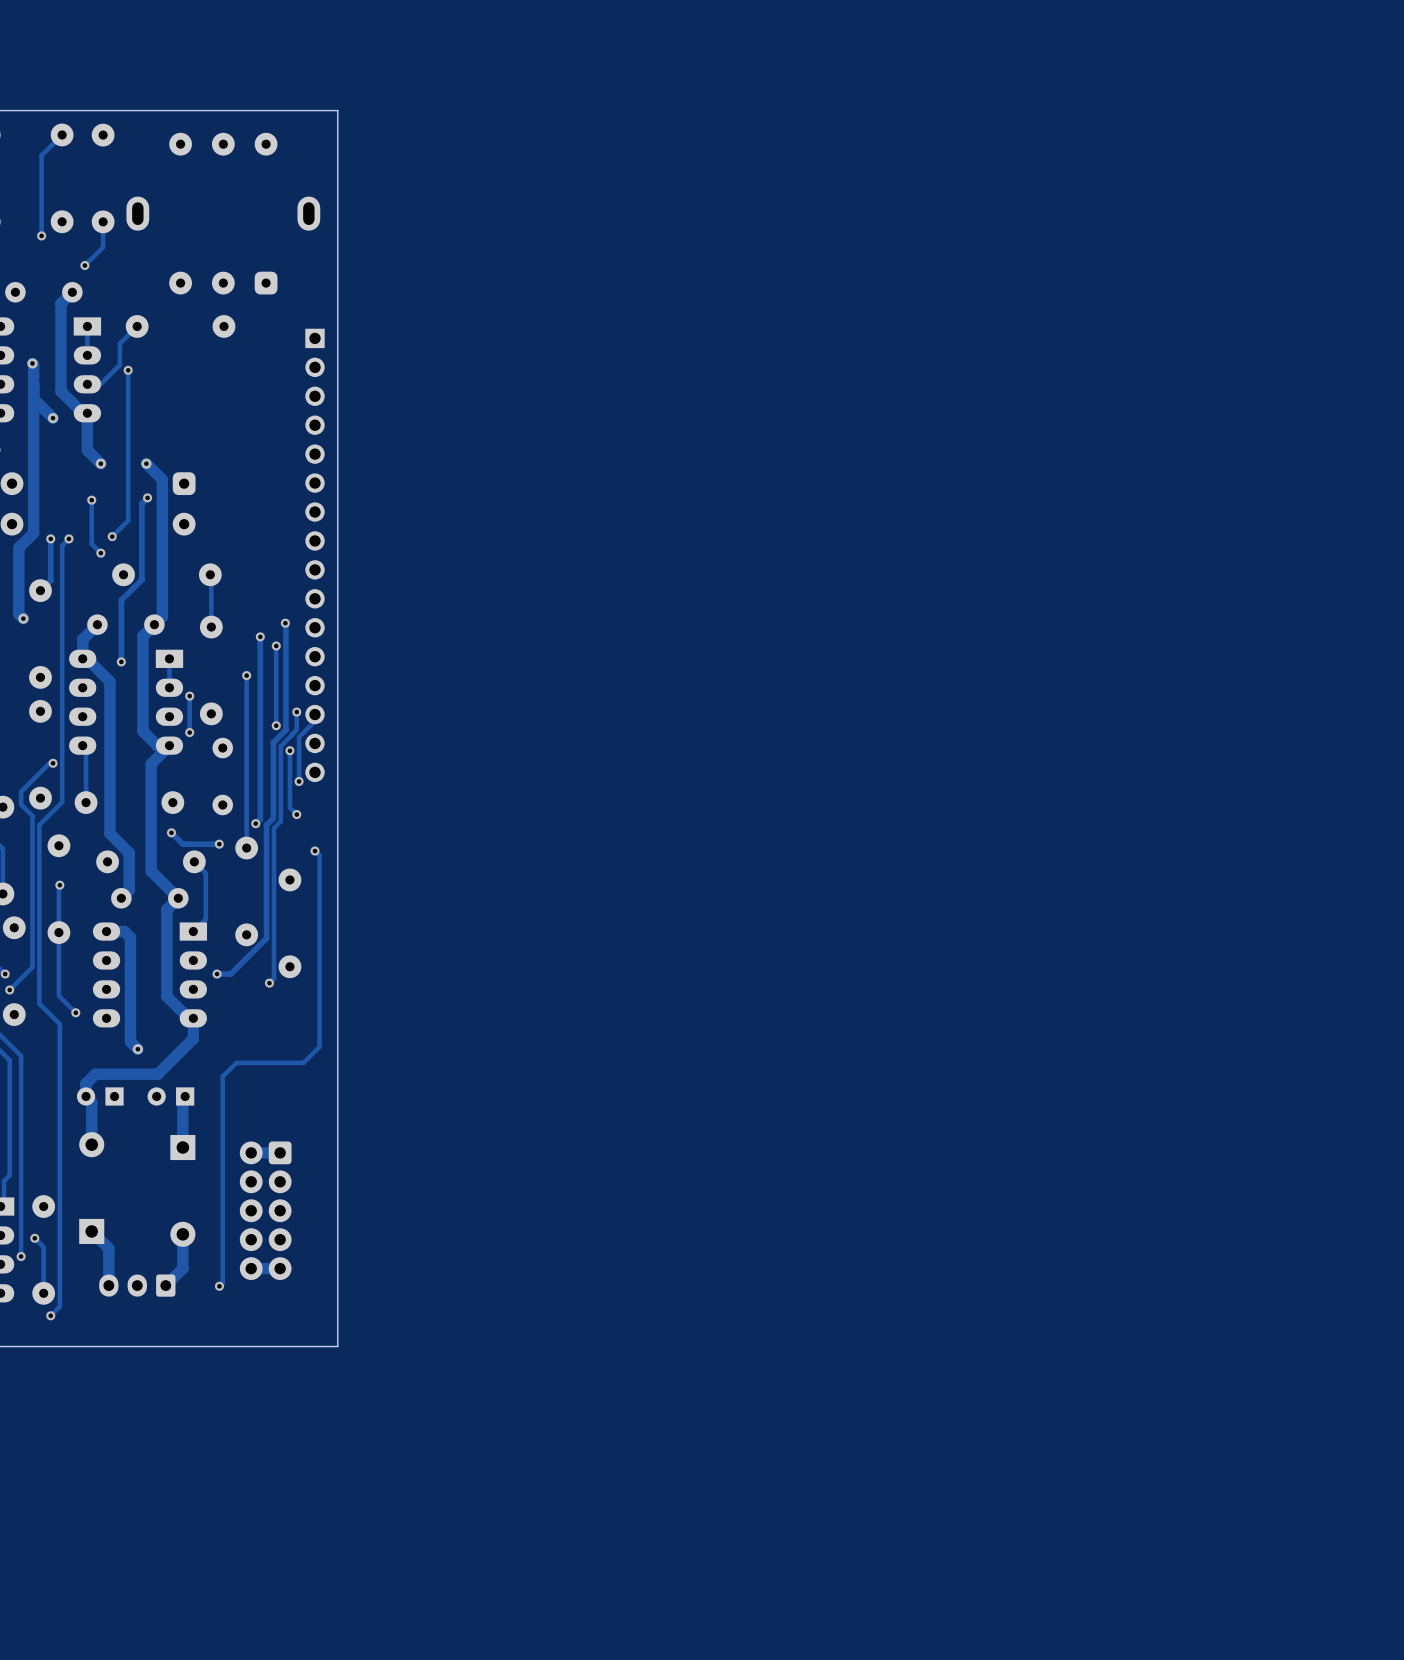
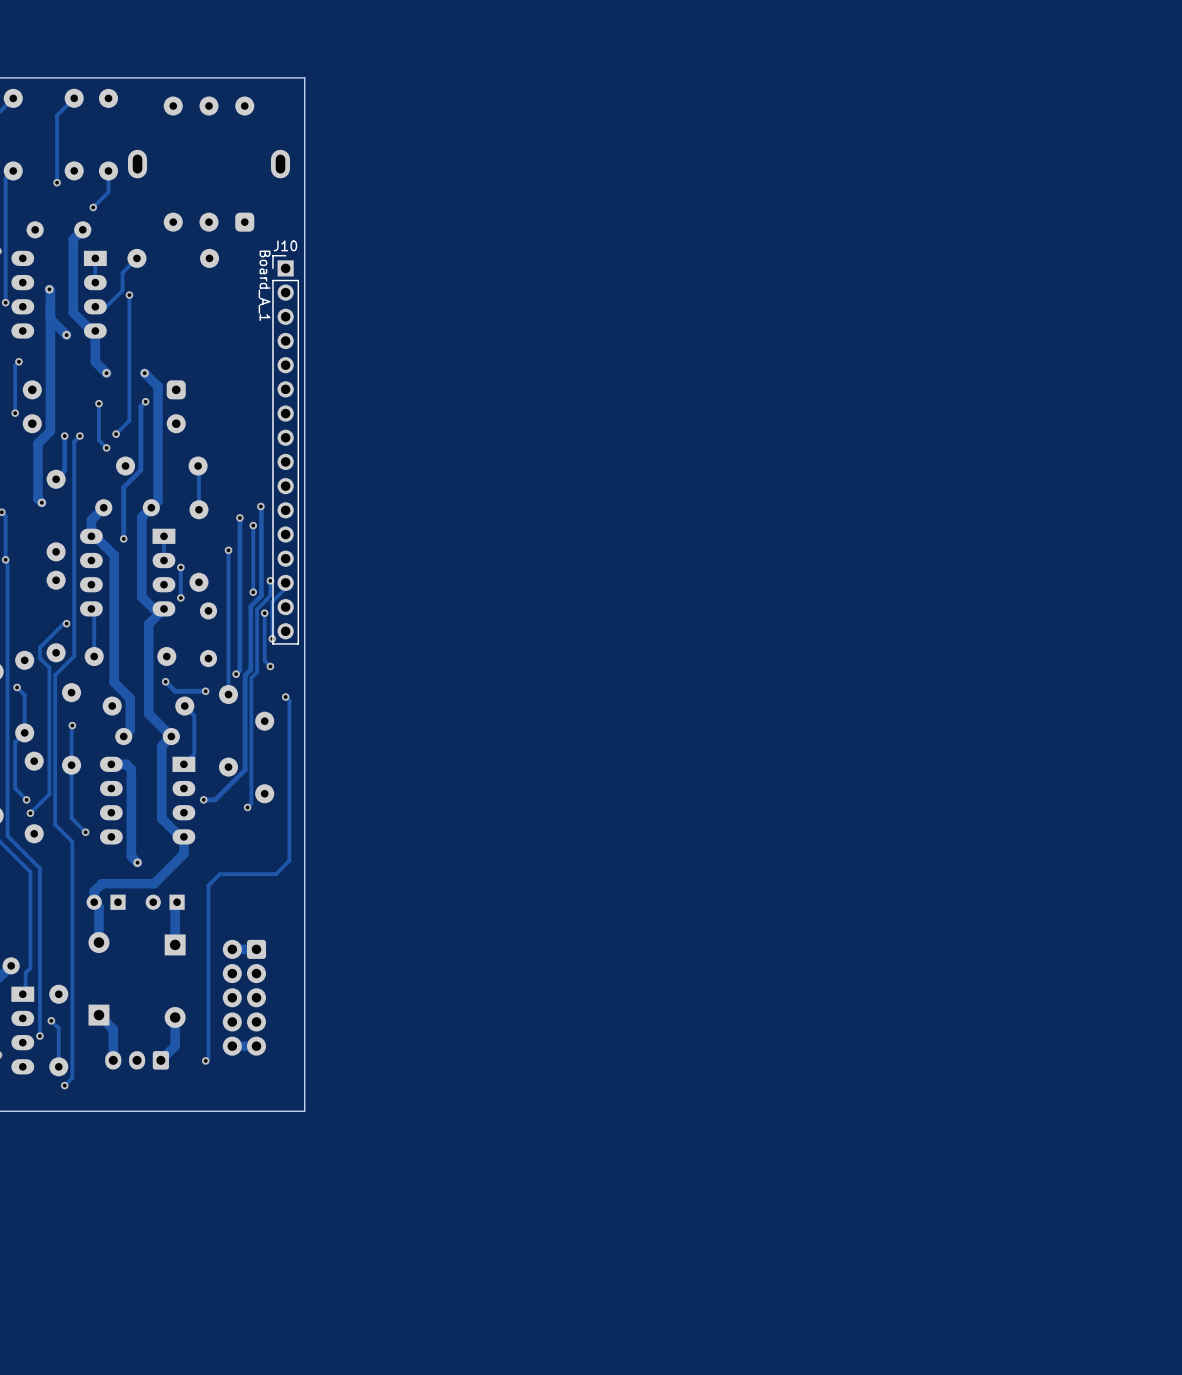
J10 side: top (315, 555) -> bottom (285, 449)

